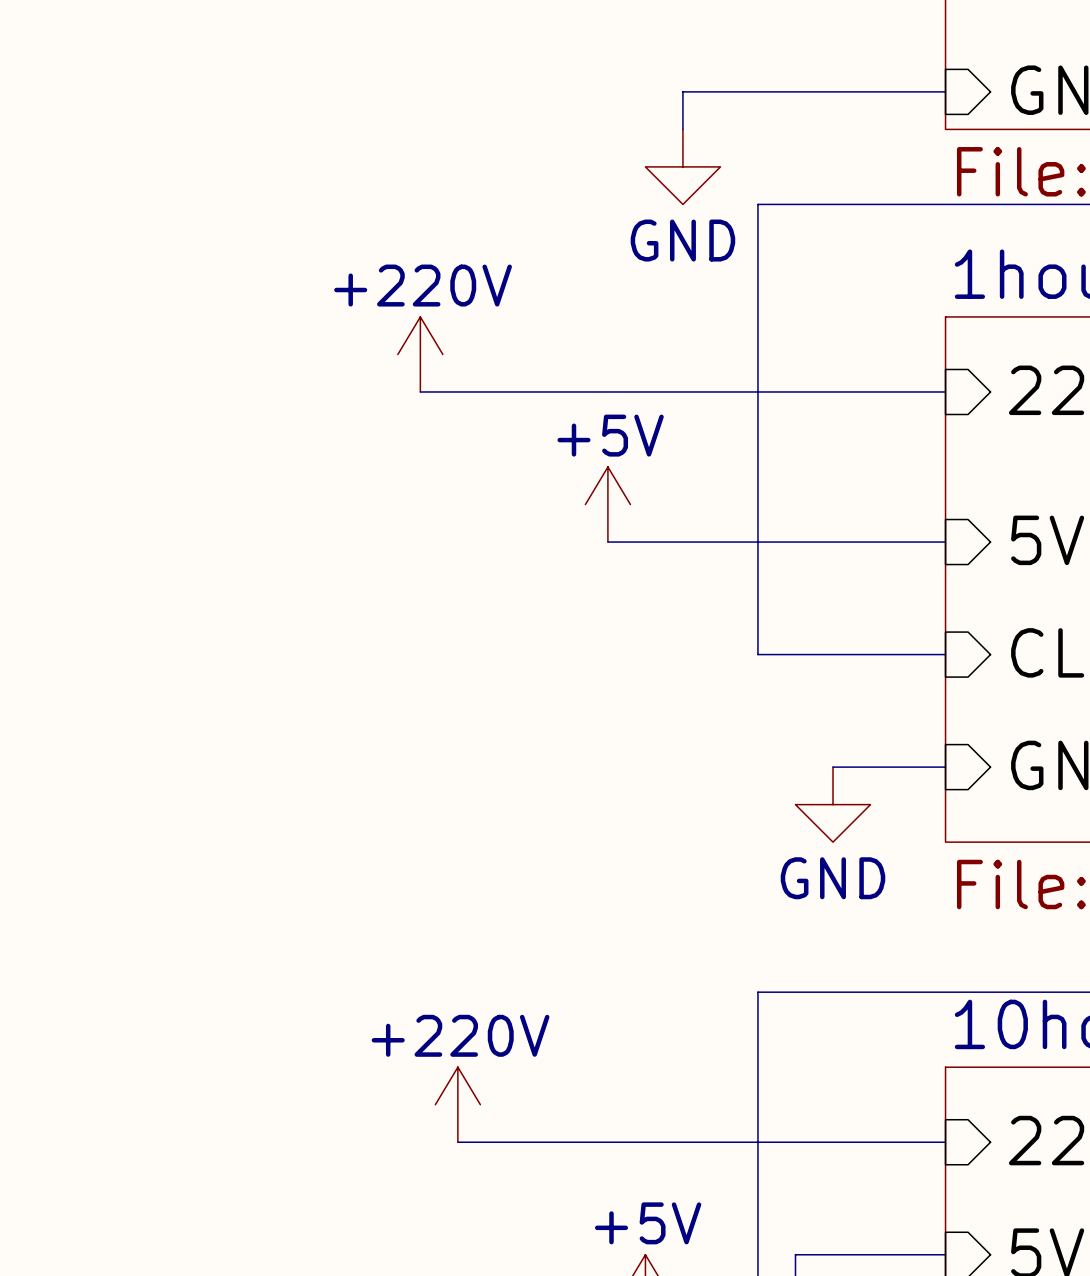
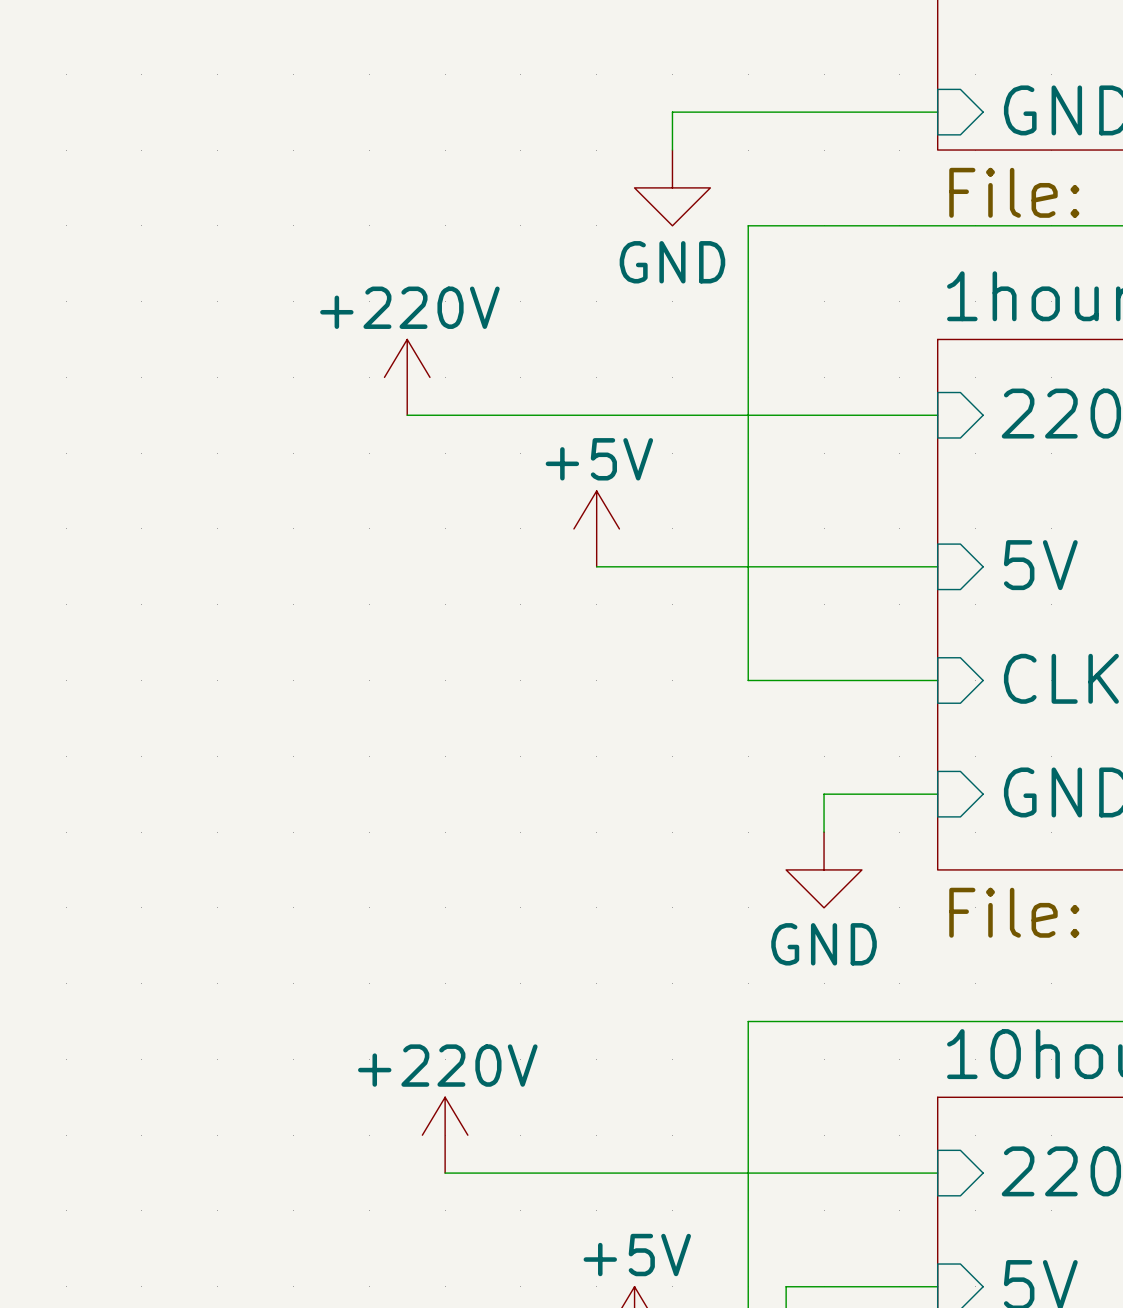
power symbol position: GND (833, 804) -> GND (824, 869)

